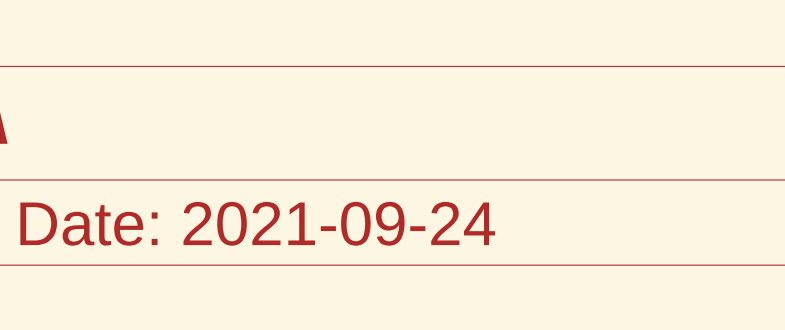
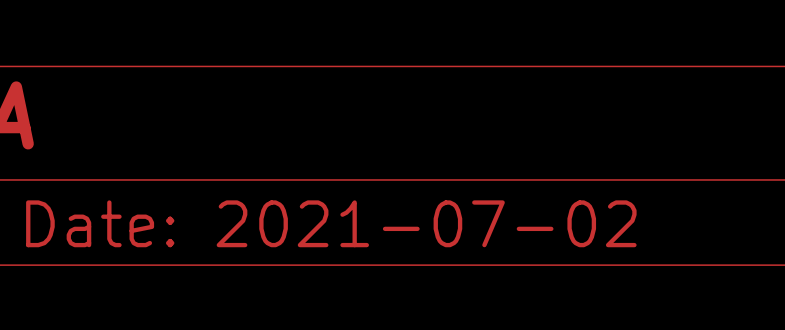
title block: Date: 2021-09-24 (257, 223) -> Date: 2021-07-02 (331, 223)

